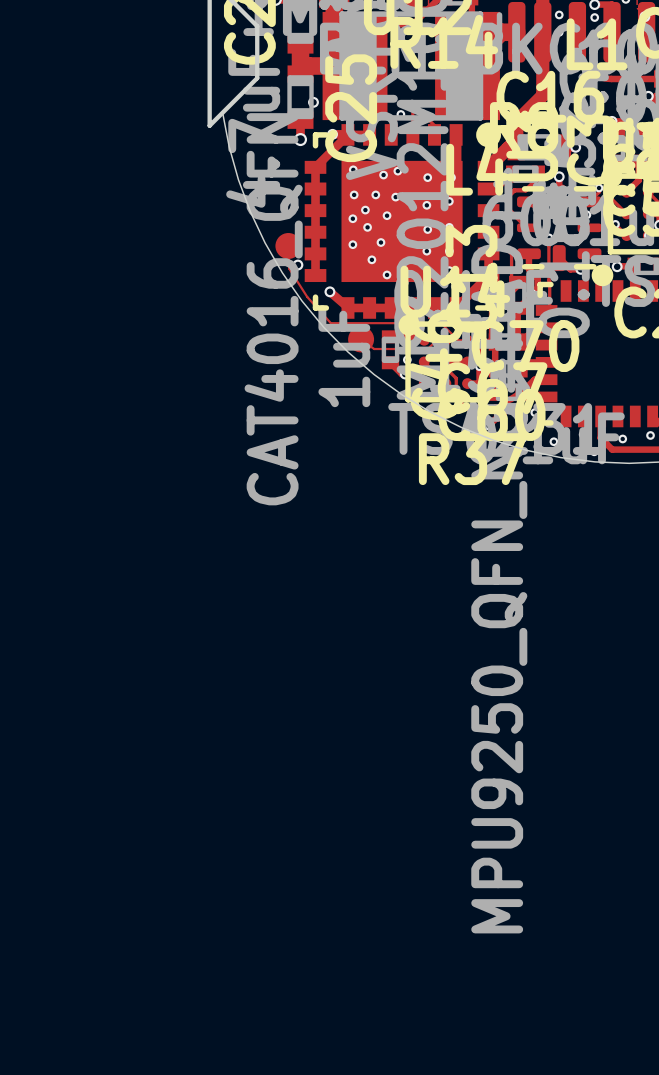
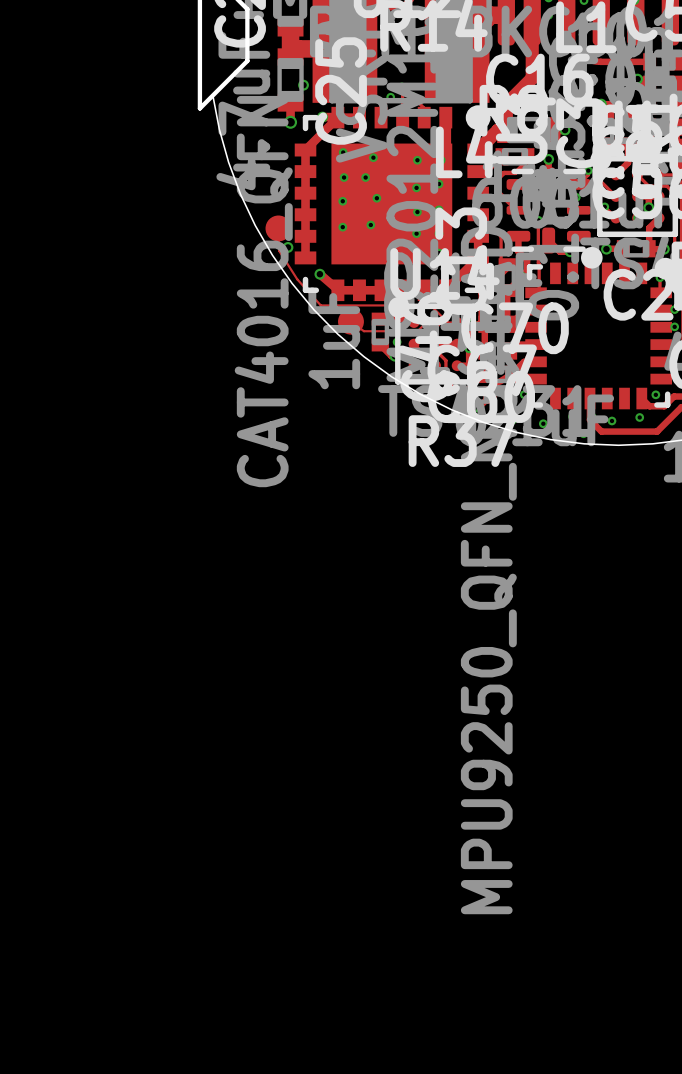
via: (397, 171) -> none
via: (395, 197) -> none
via: (365, 210) -> none
via: (367, 227) -> none
via: (371, 259) -> none
via: (387, 274) -> none

